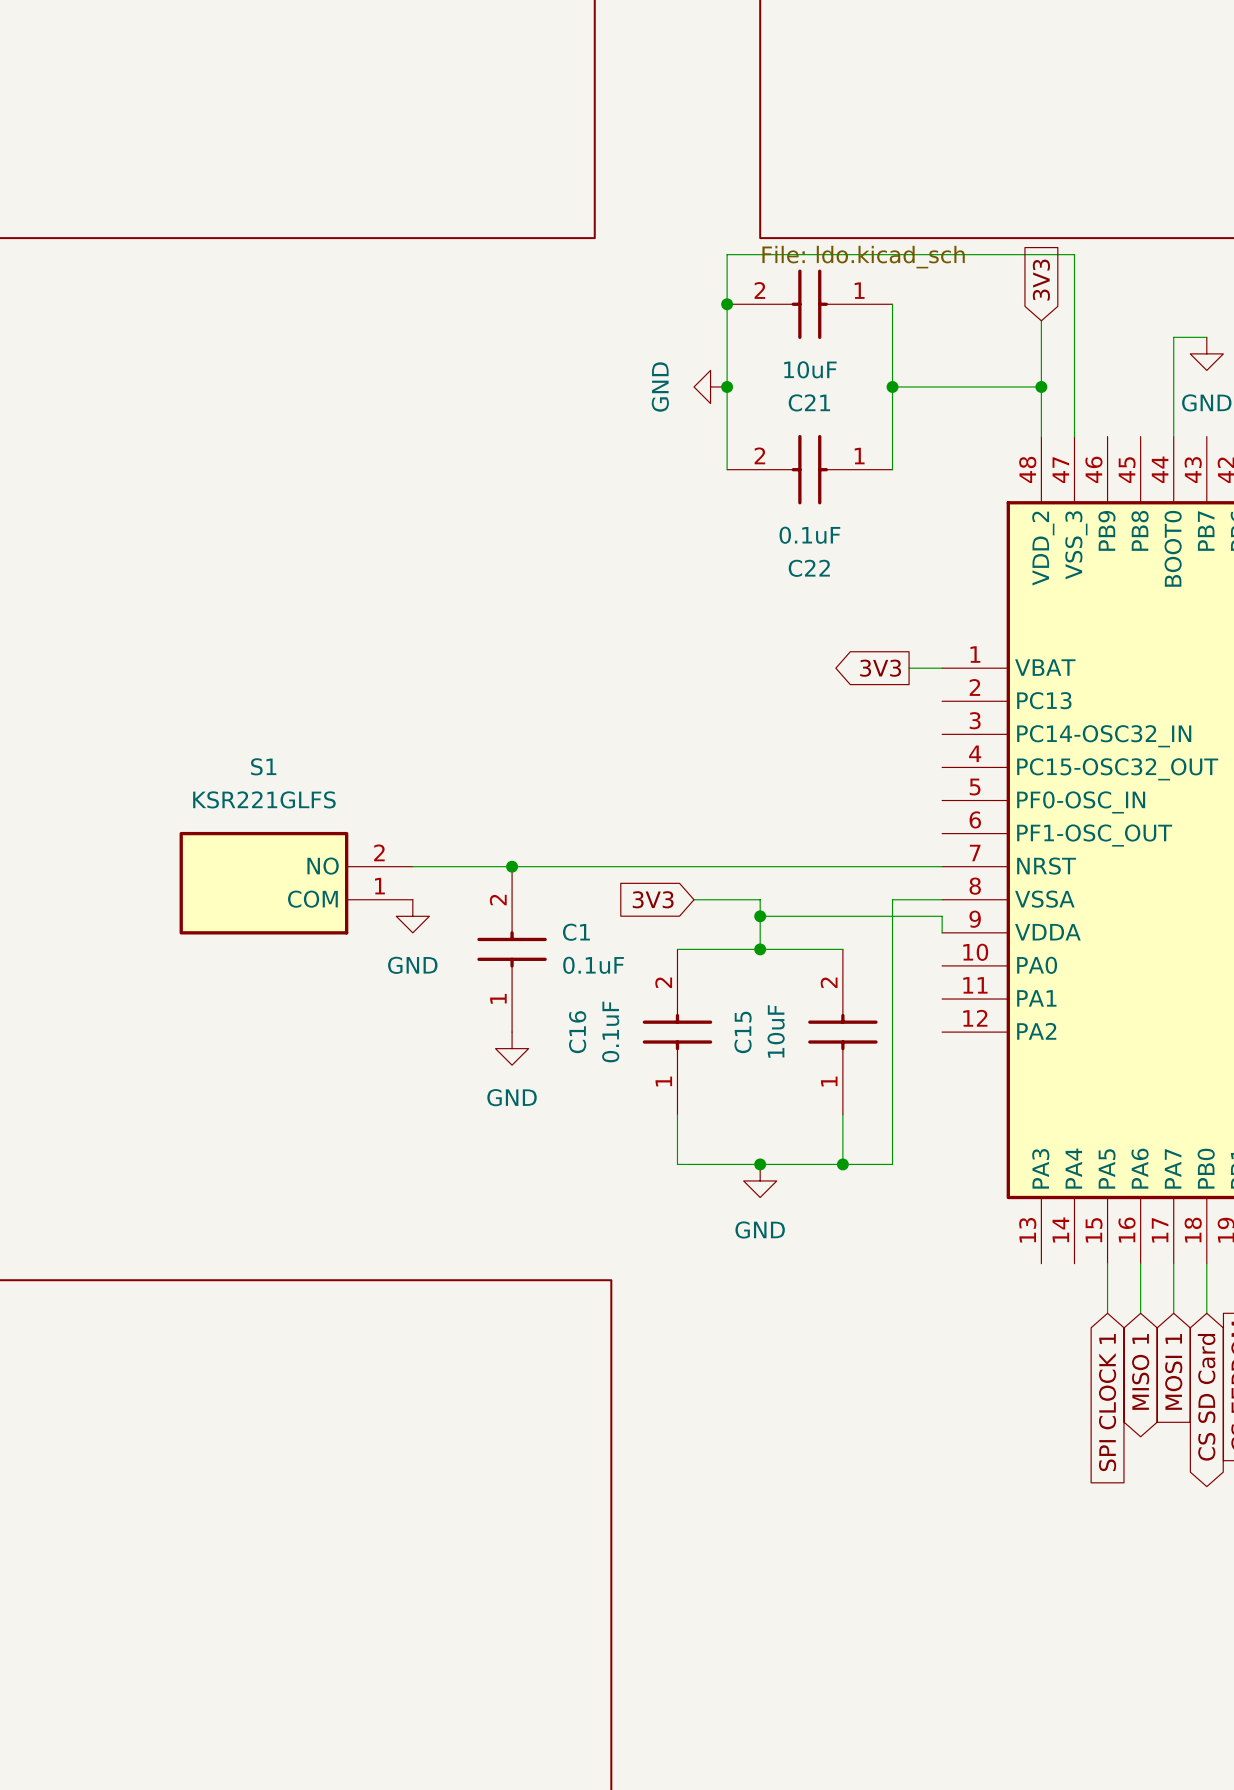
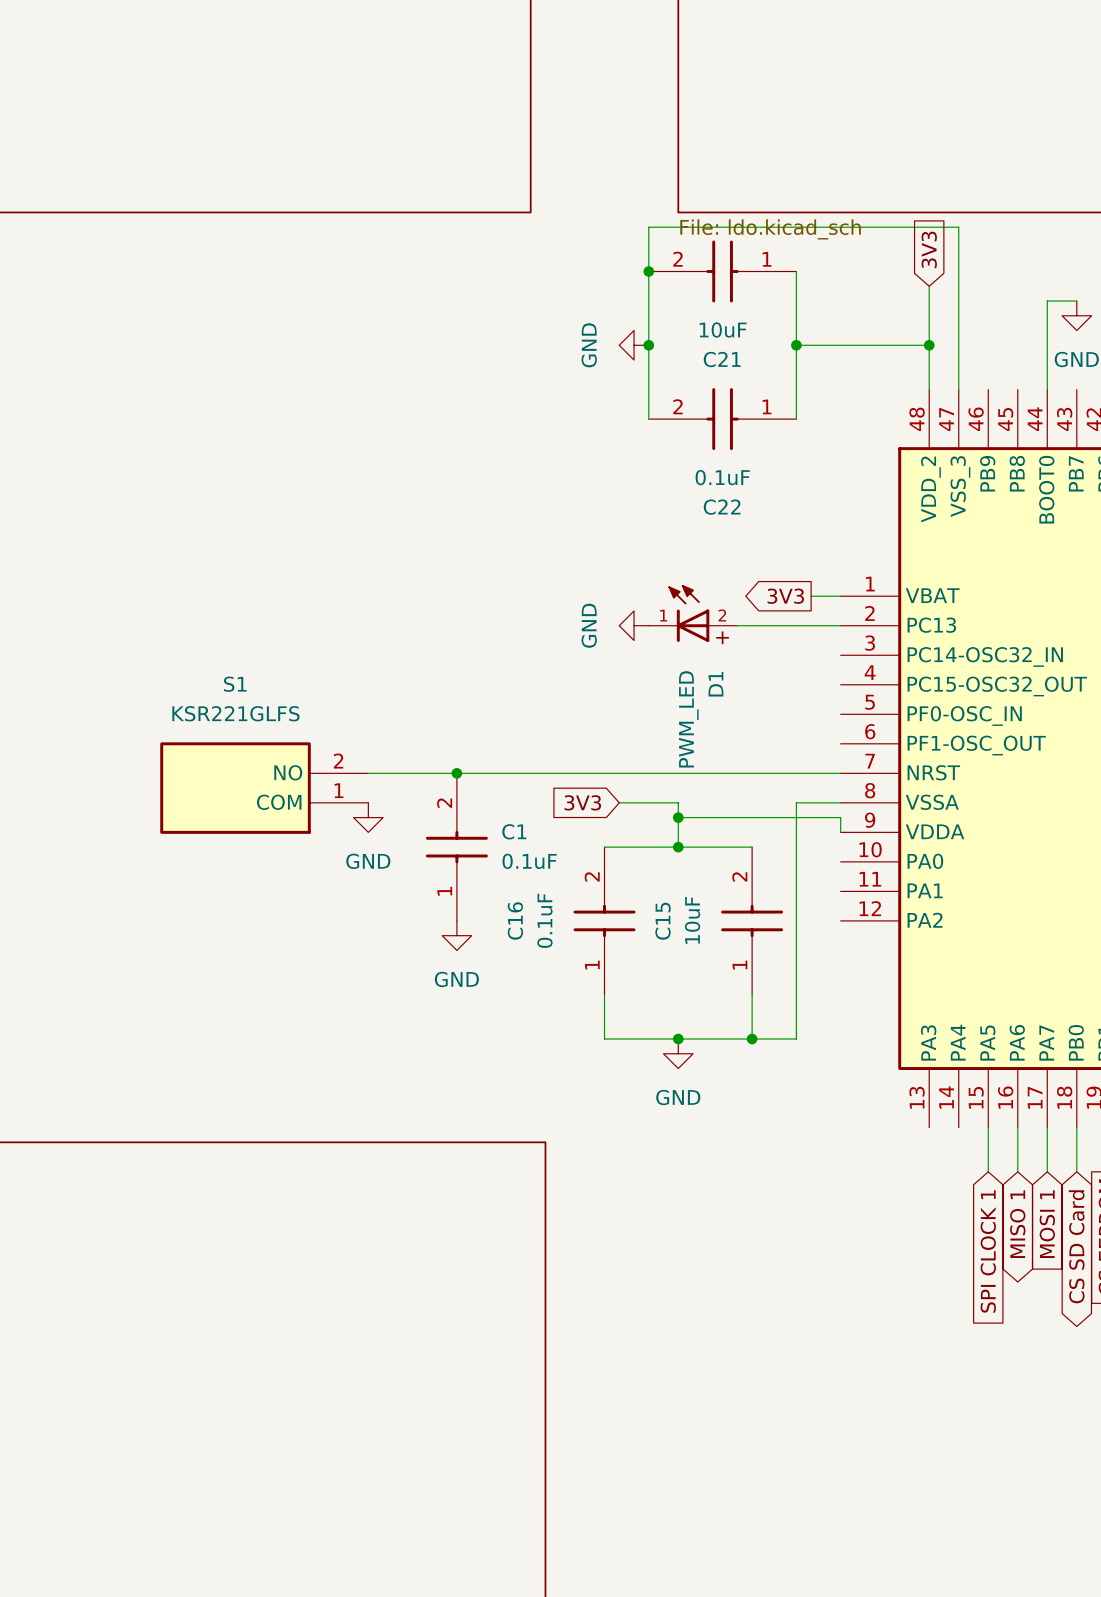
D1: none -> PWM_LED (693, 613)
power symbol: none -> GND (634, 625)
wire: none -> (737, 625) (840, 625)

